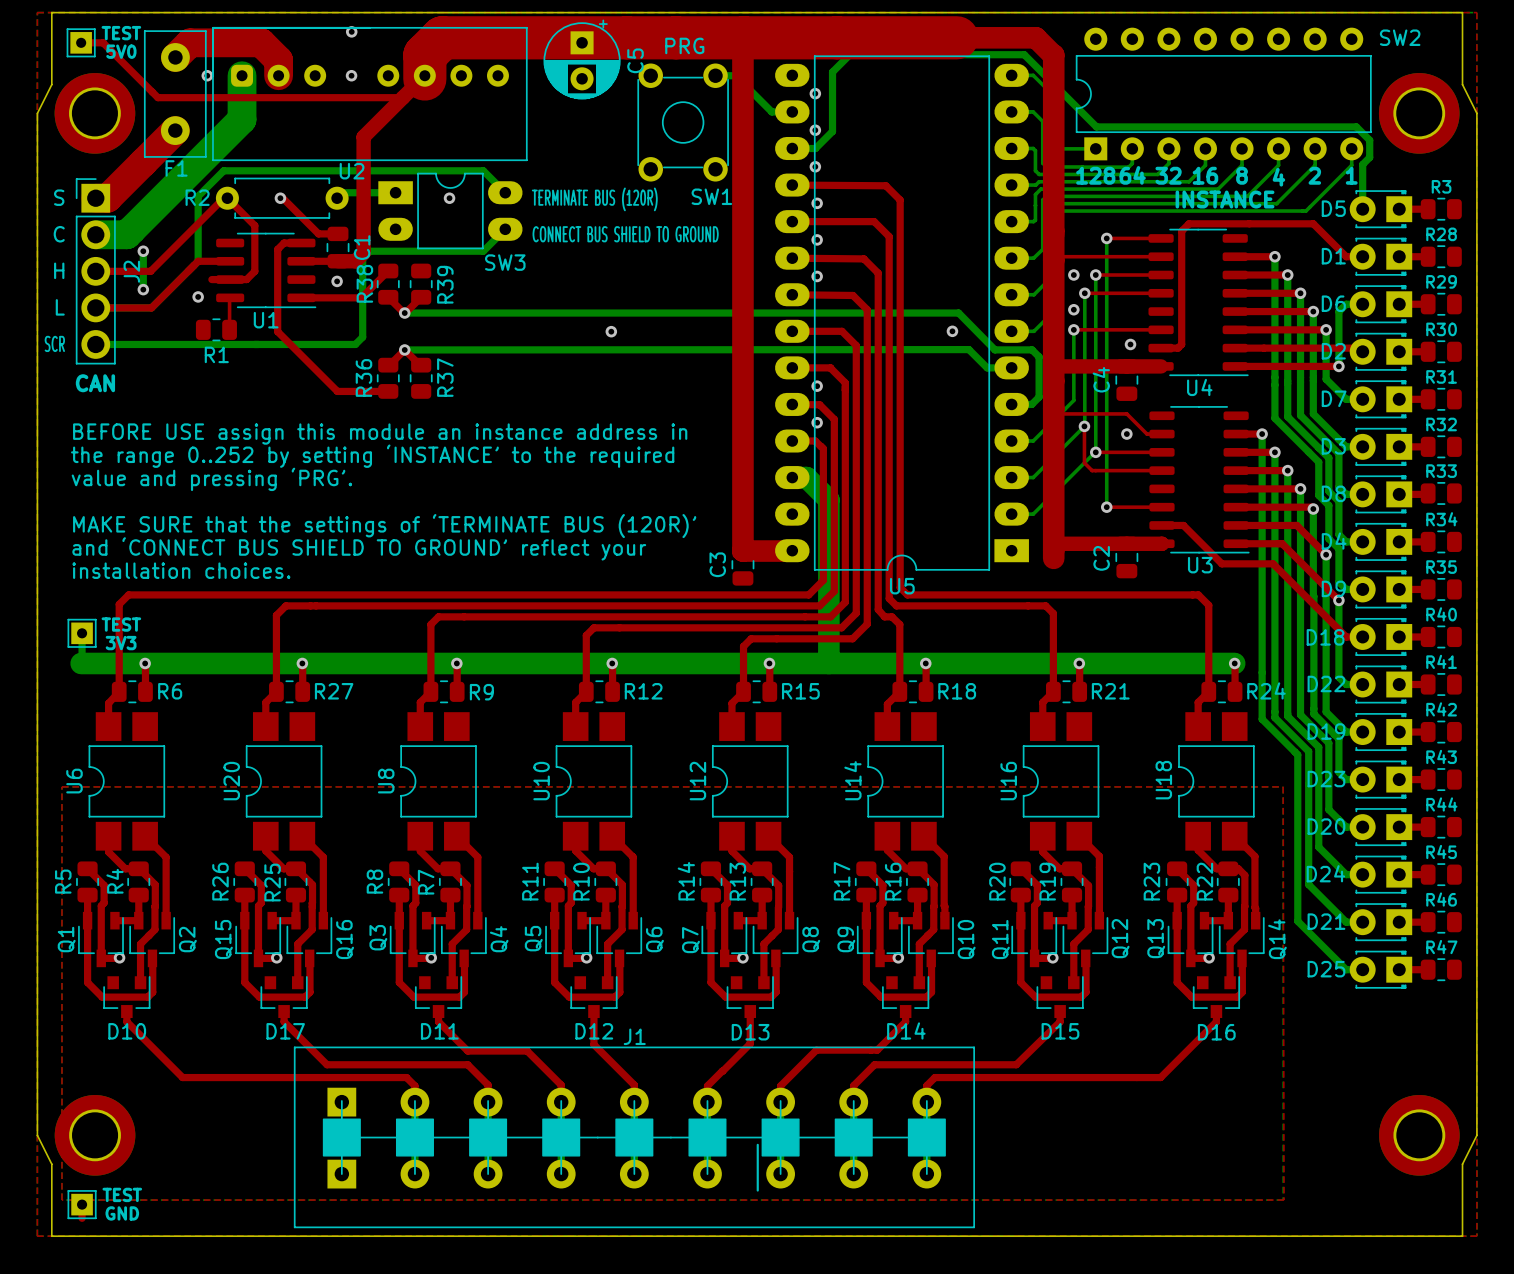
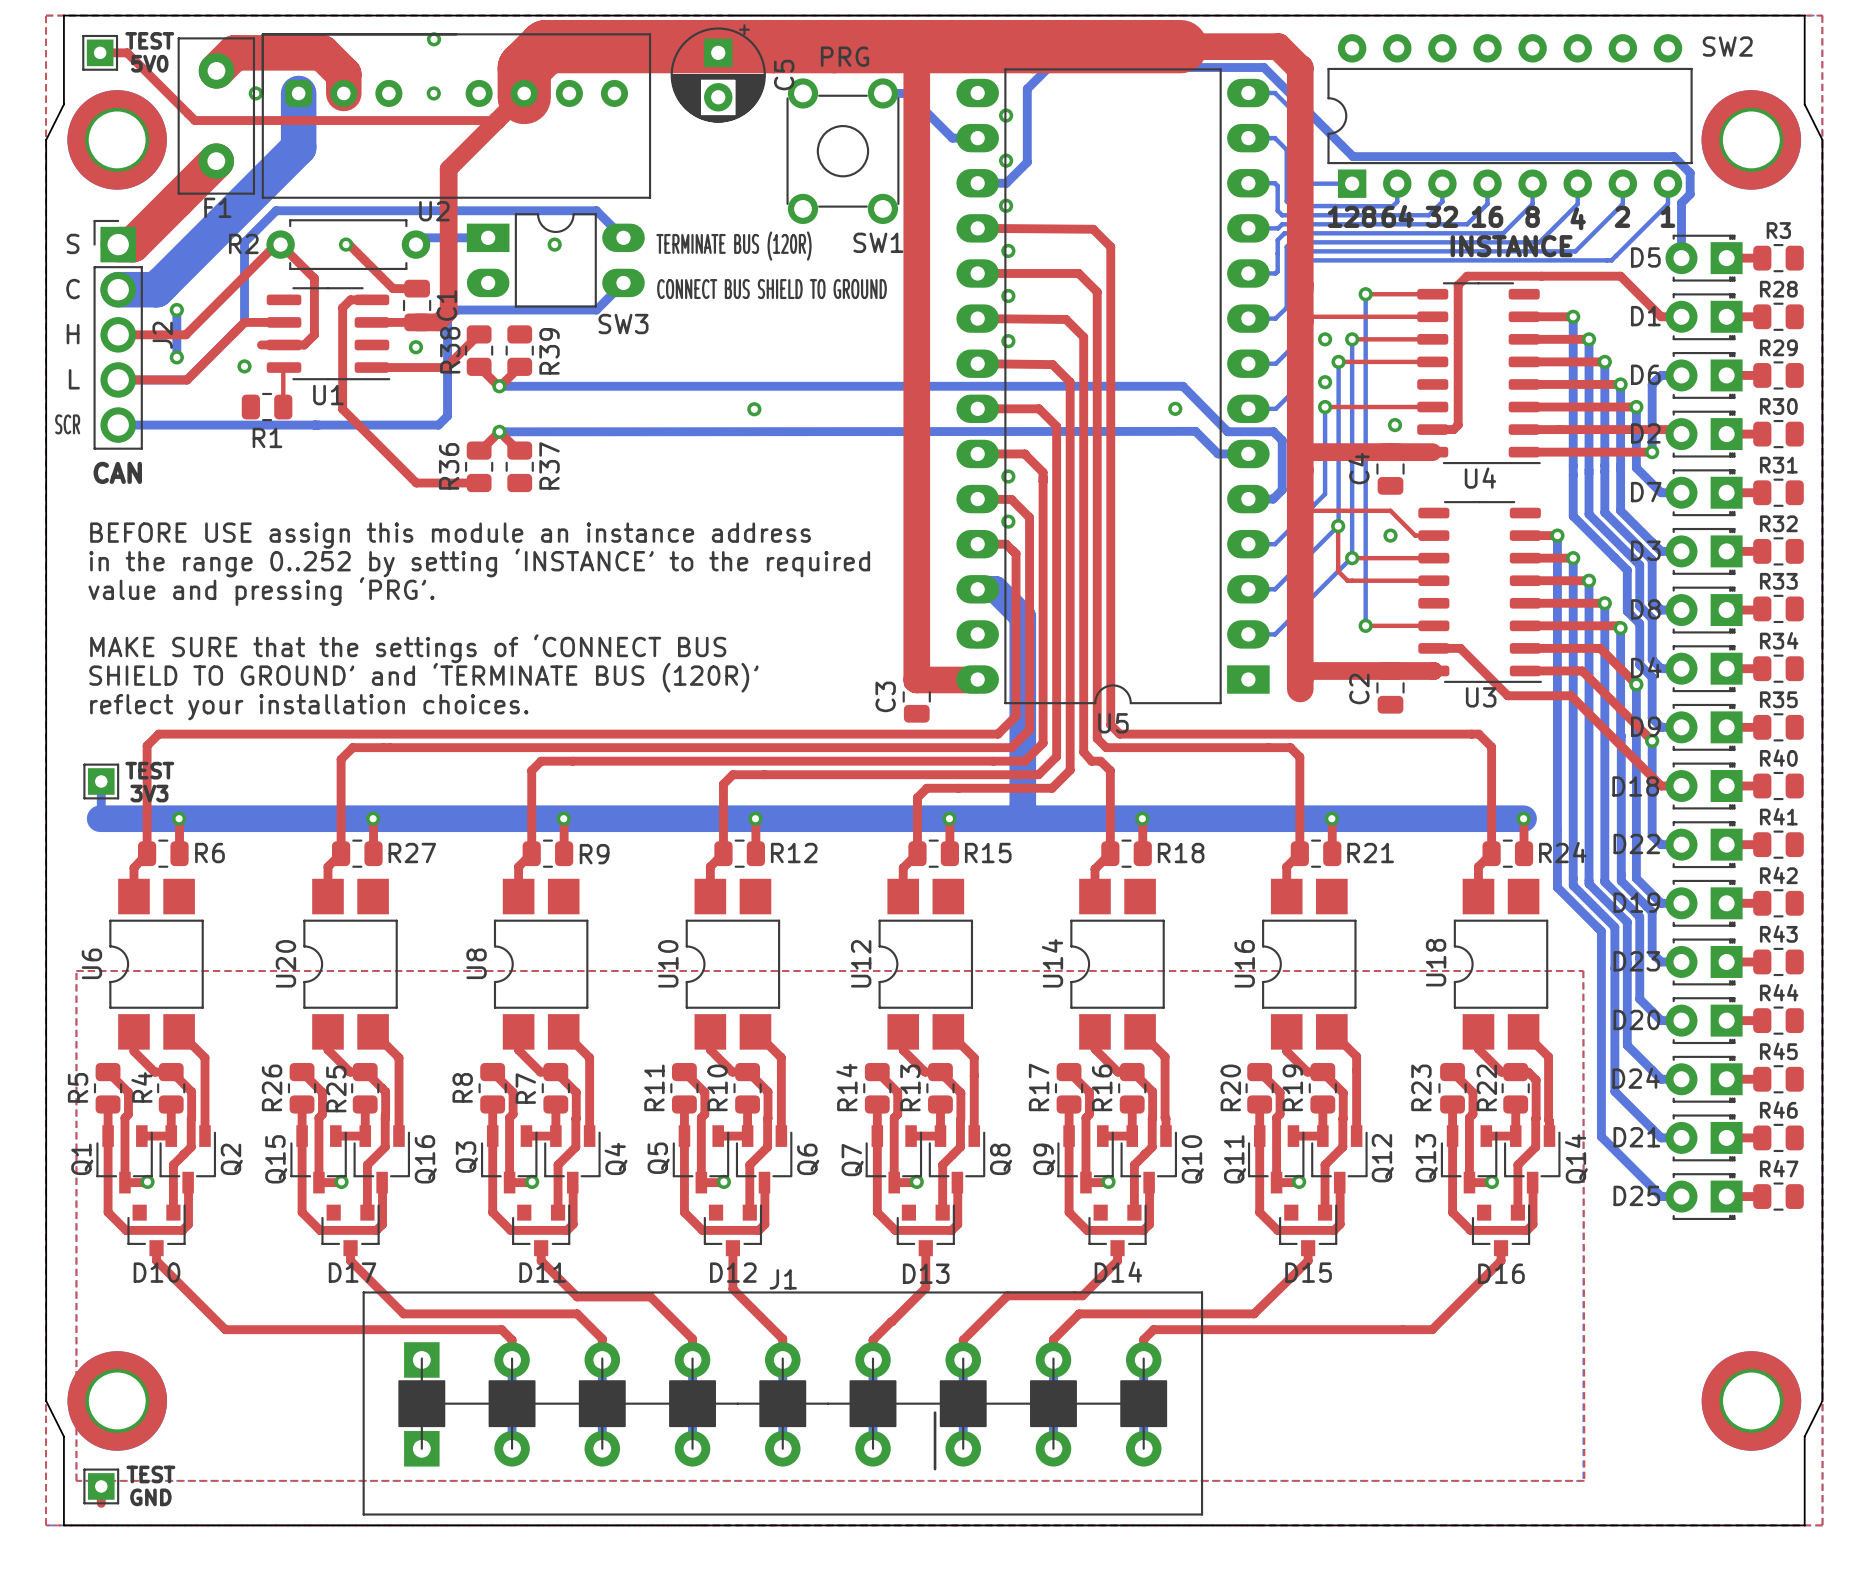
text: BEFORE USE assign this module an instance address in (380, 434) -> BEFORE USE assign this module an instance address (450, 535)
text: the range 0..252 by setting ‘INSTANCE’ to the required (372, 456) -> in the range 0..252 by setting ‘INSTANCE’ to the required (479, 562)
text: MAKE SURE that the settings of ‘TERMINATE BUS (120R)’ (384, 526) -> MAKE SURE that the settings of ‘CONNECT BUS (408, 648)
text: and ‘CONNECT BUS SHIELD TO GROUND’ reflect your (359, 548) -> SHIELD TO GROUND’ and ‘TERMINATE BUS (120R)’ (423, 677)
text: installation choices. (181, 570) -> reflect your installation choices. (309, 707)

